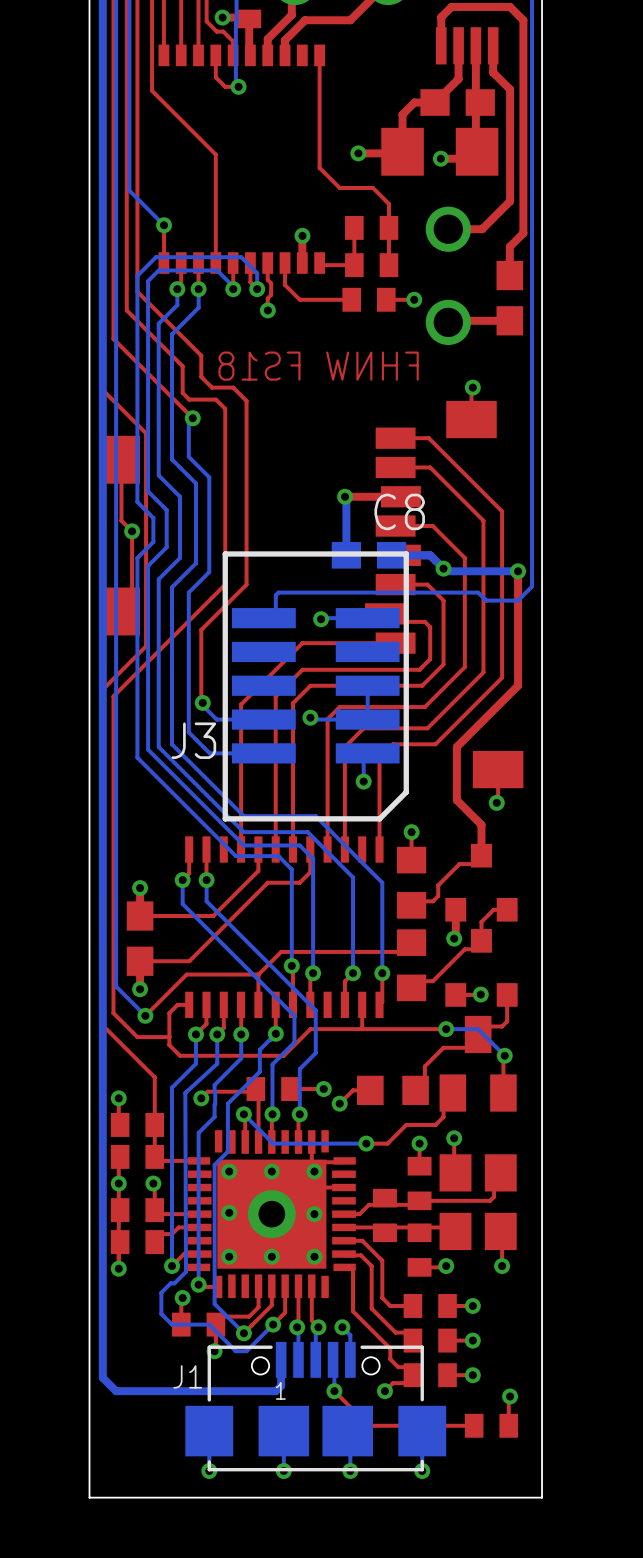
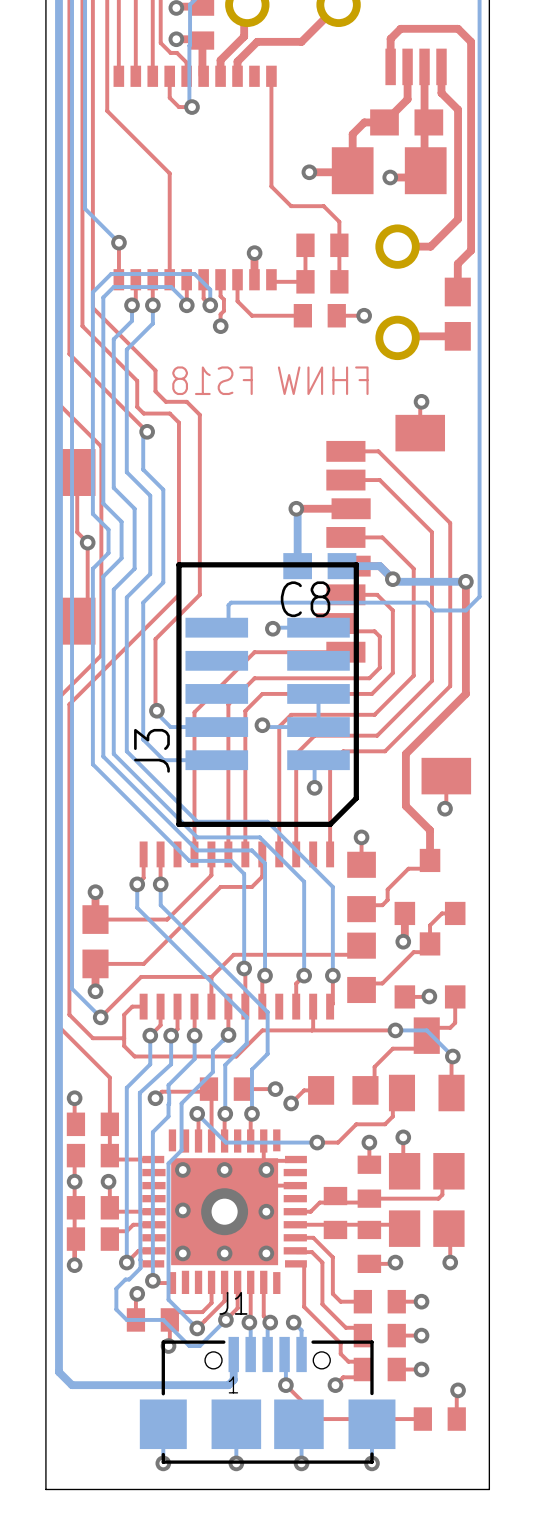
C8 name position: C8 (399, 511) -> C8 (305, 599)
J3 name rotation: 0° (193, 740) -> 90° counterclockwise (151, 750)
J1 name position: J1 (187, 1376) -> J1 (233, 1303)

